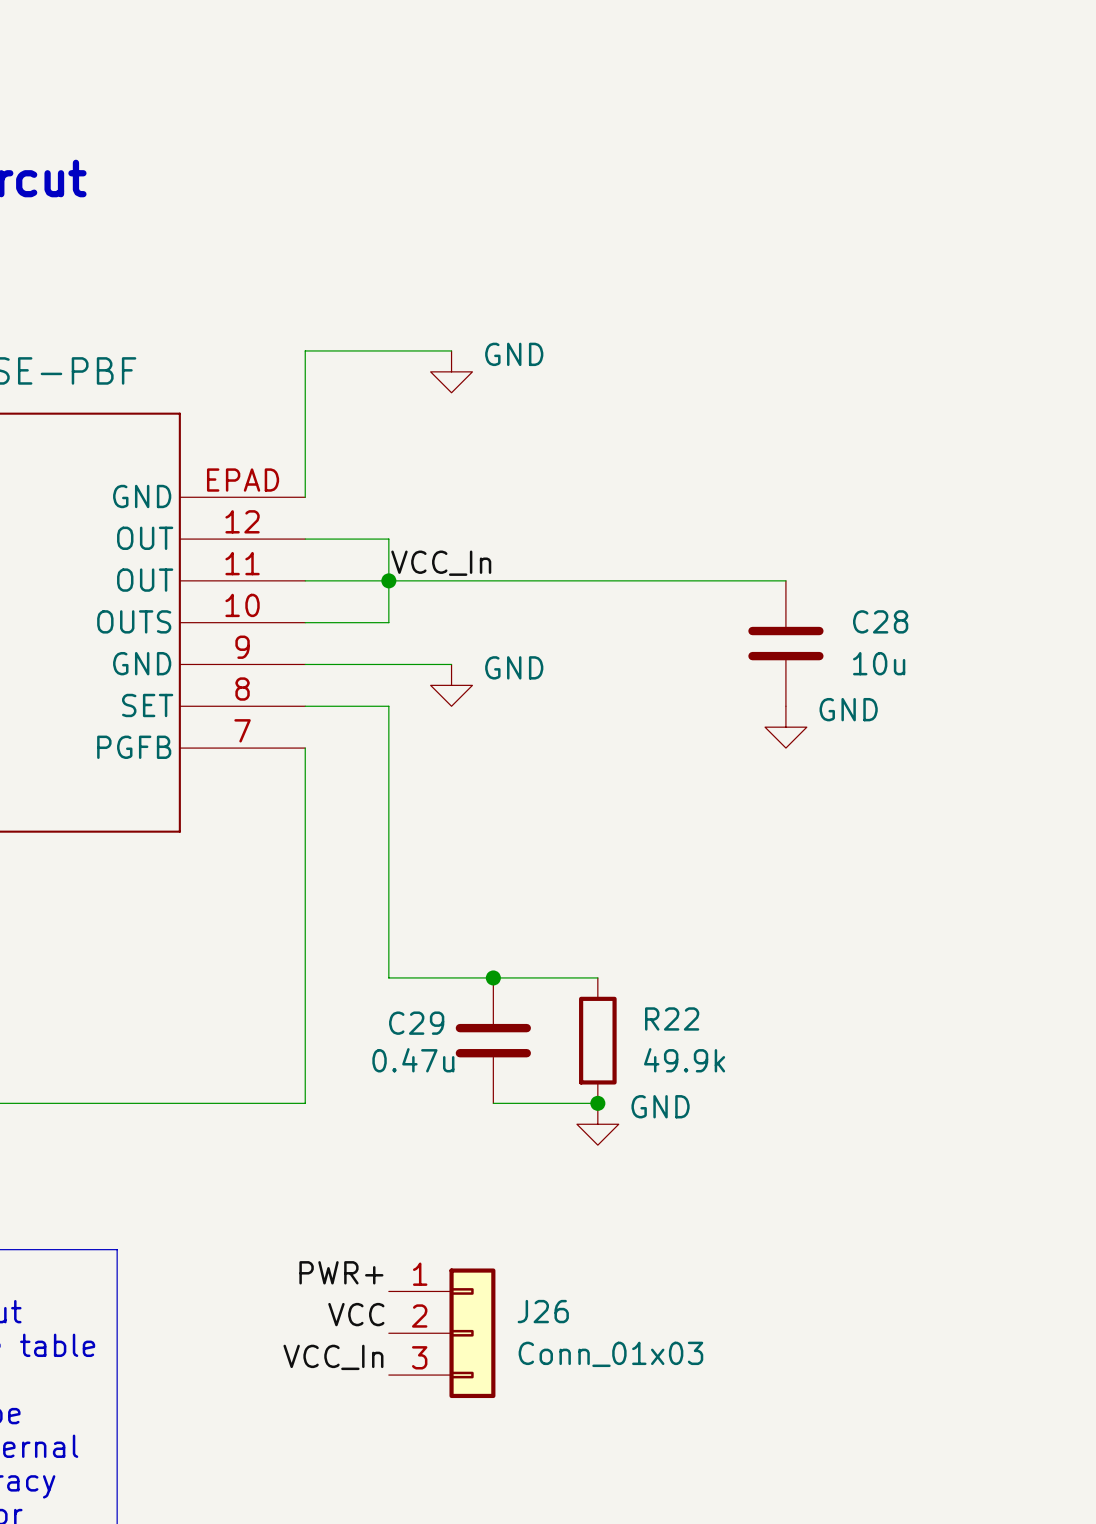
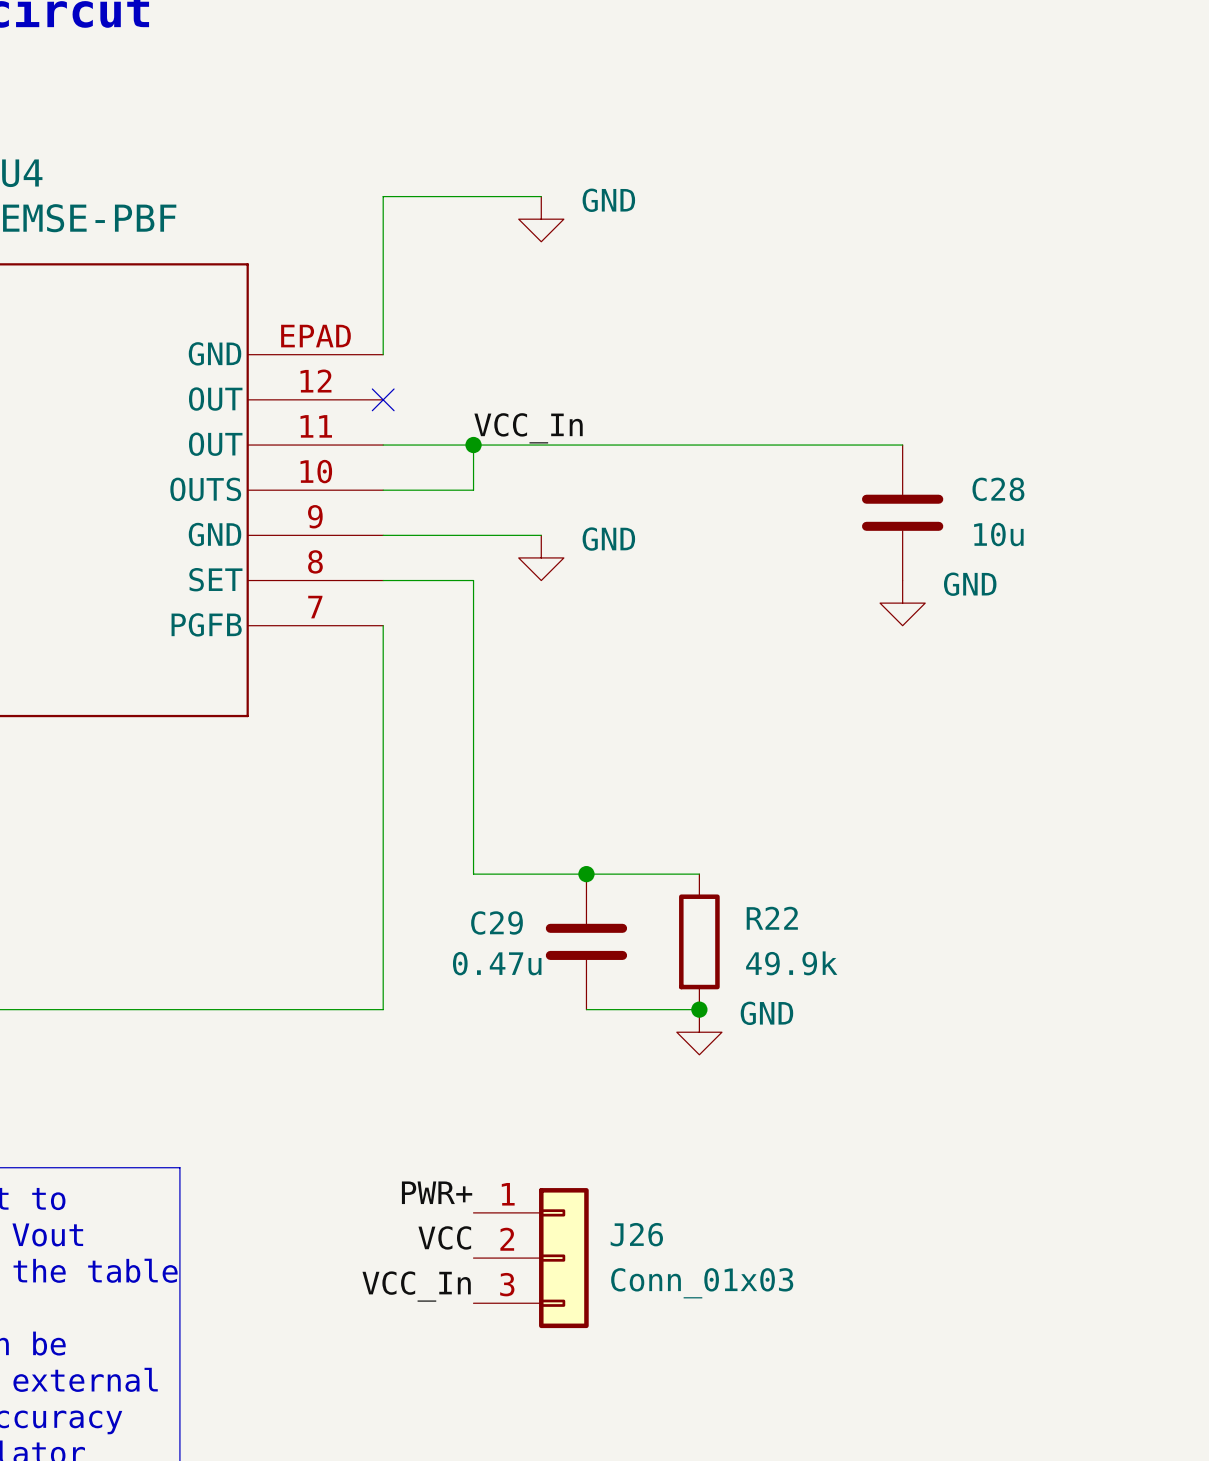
wire: (305, 539) (388, 539) (388, 580) -> none
no-connect mark: none -> (383, 399)

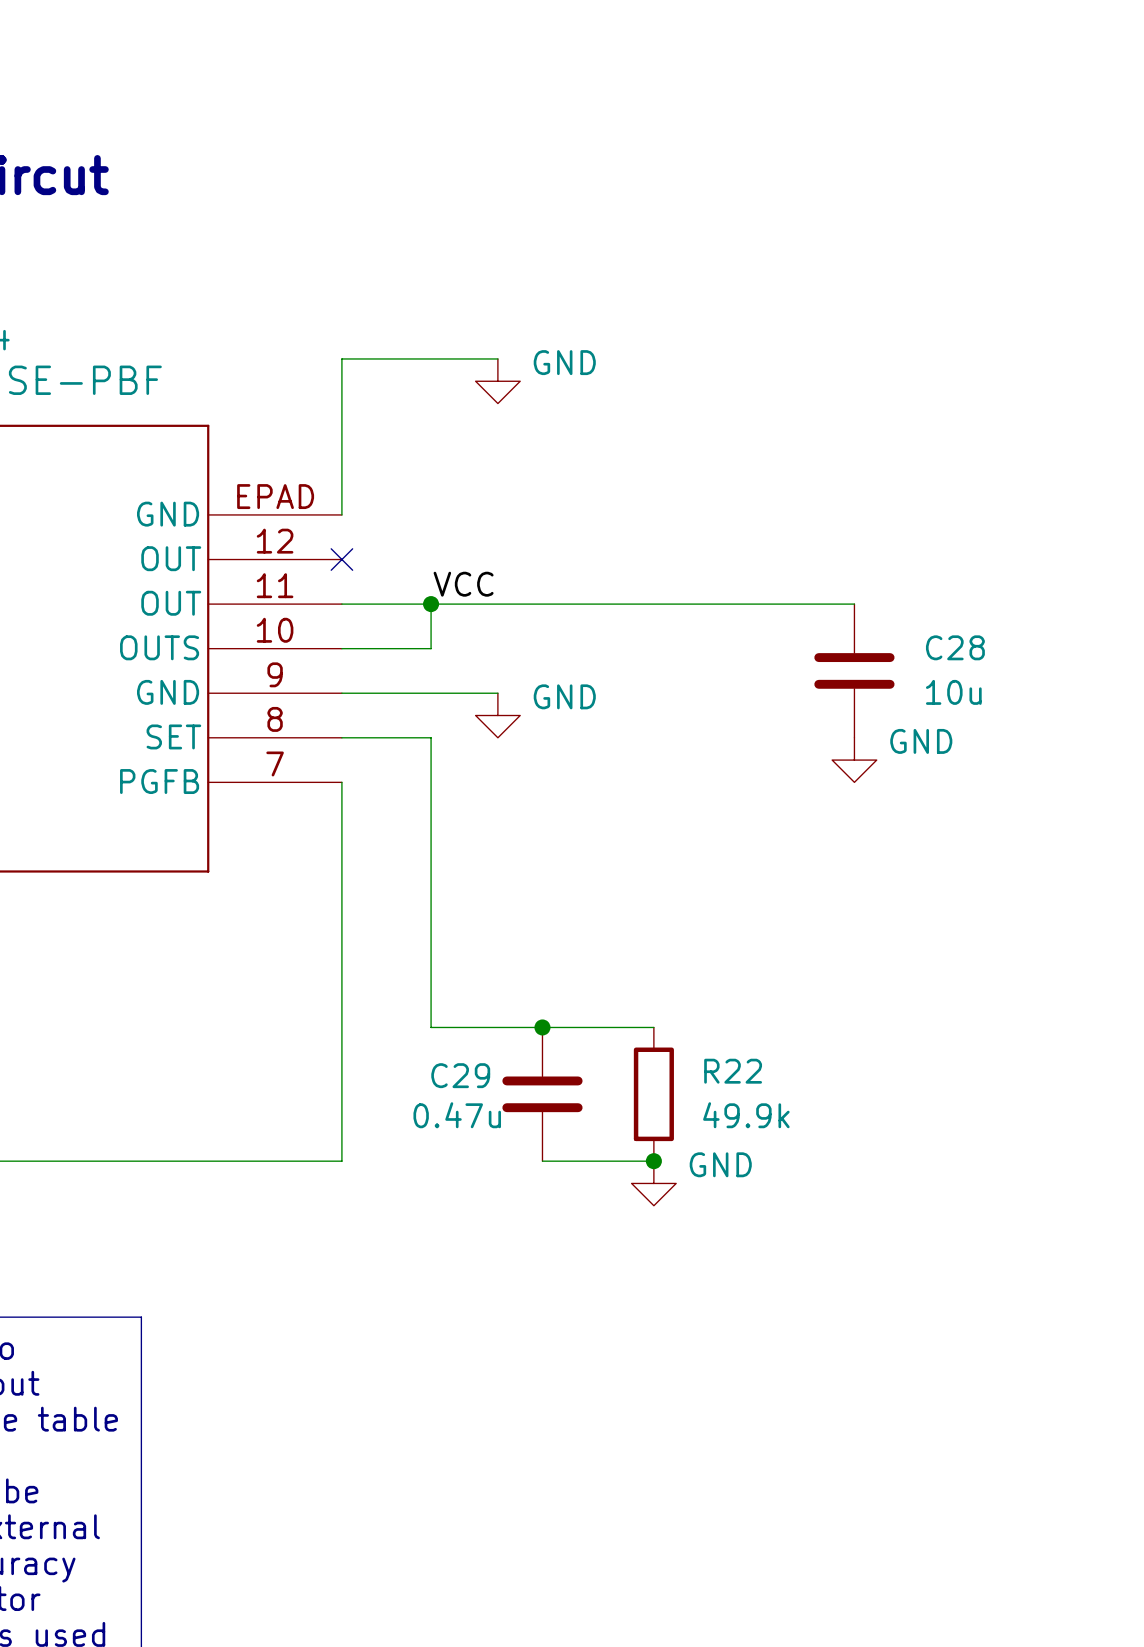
label: VCC_In (528, 428) -> VCC (463, 584)
label: PWR+ (437, 1192) -> none
label: VCC (444, 1237) -> none
J26: Conn_01x03 (531, 1258) -> none
label: VCC_In (416, 1286) -> none

